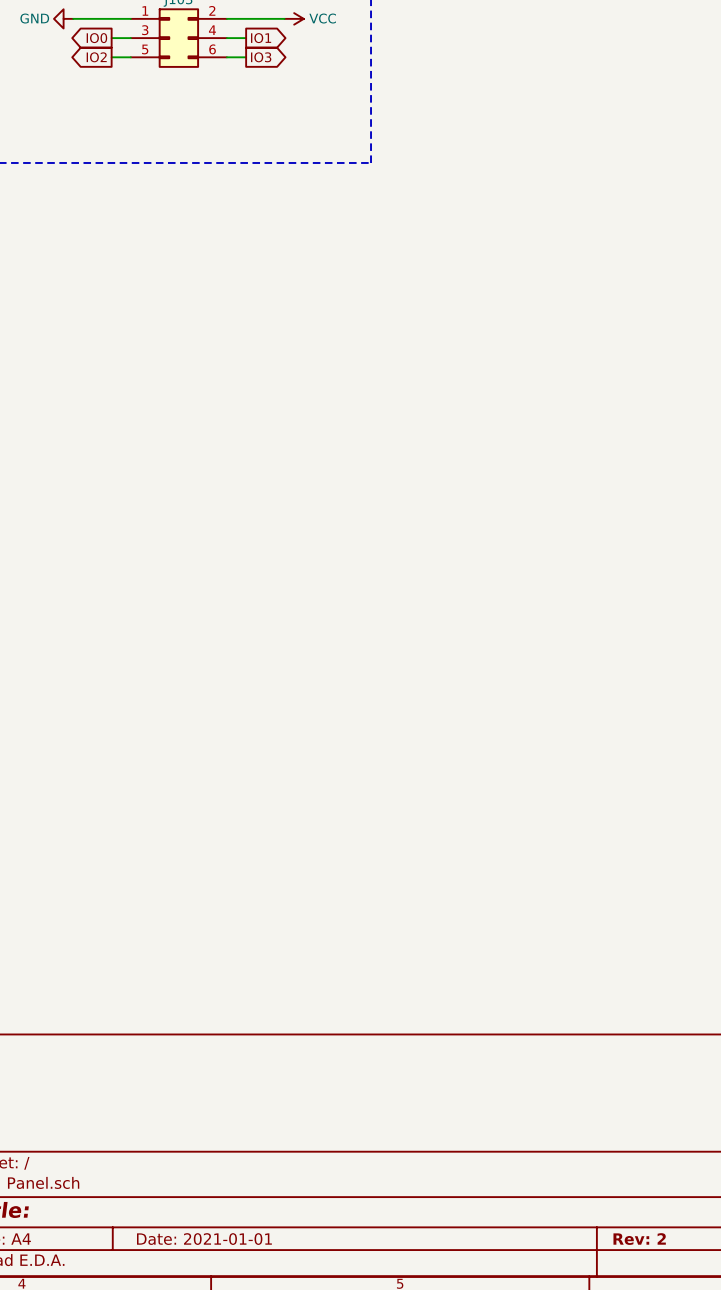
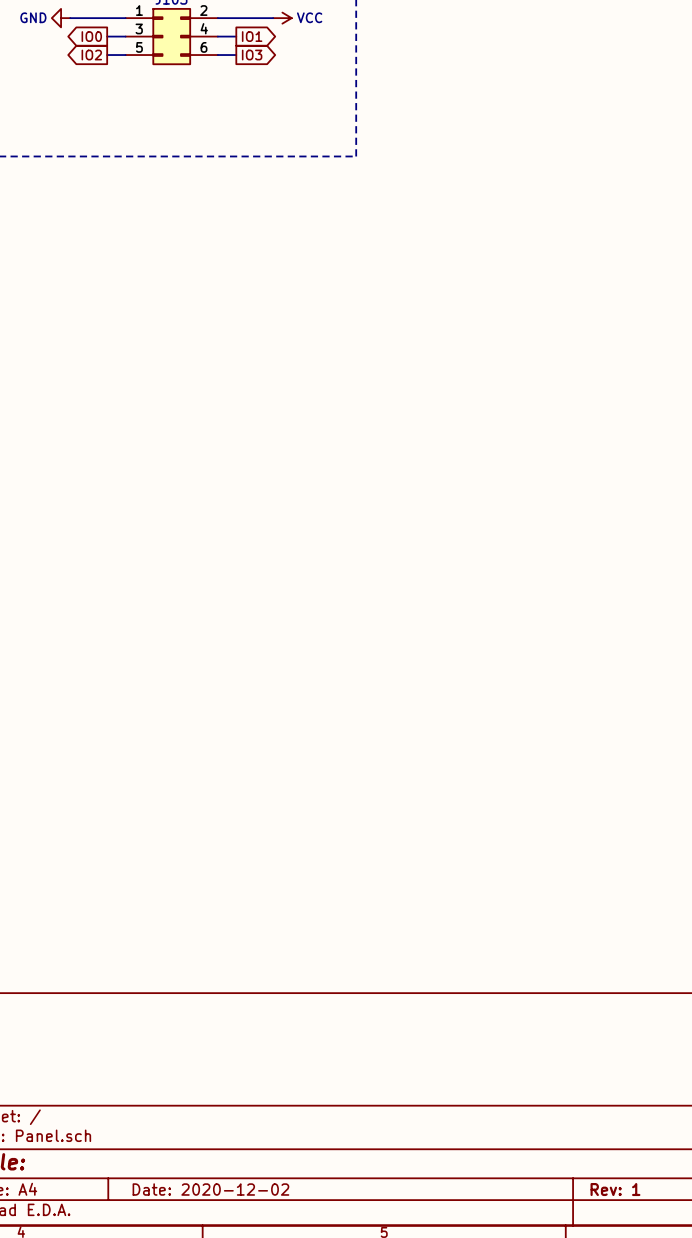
title block: Date: 2021-01-01 (204, 1239) -> Date: 2020-12-02 (210, 1189)
title block: Rev: 2 (639, 1239) -> Rev: 1 (615, 1189)

